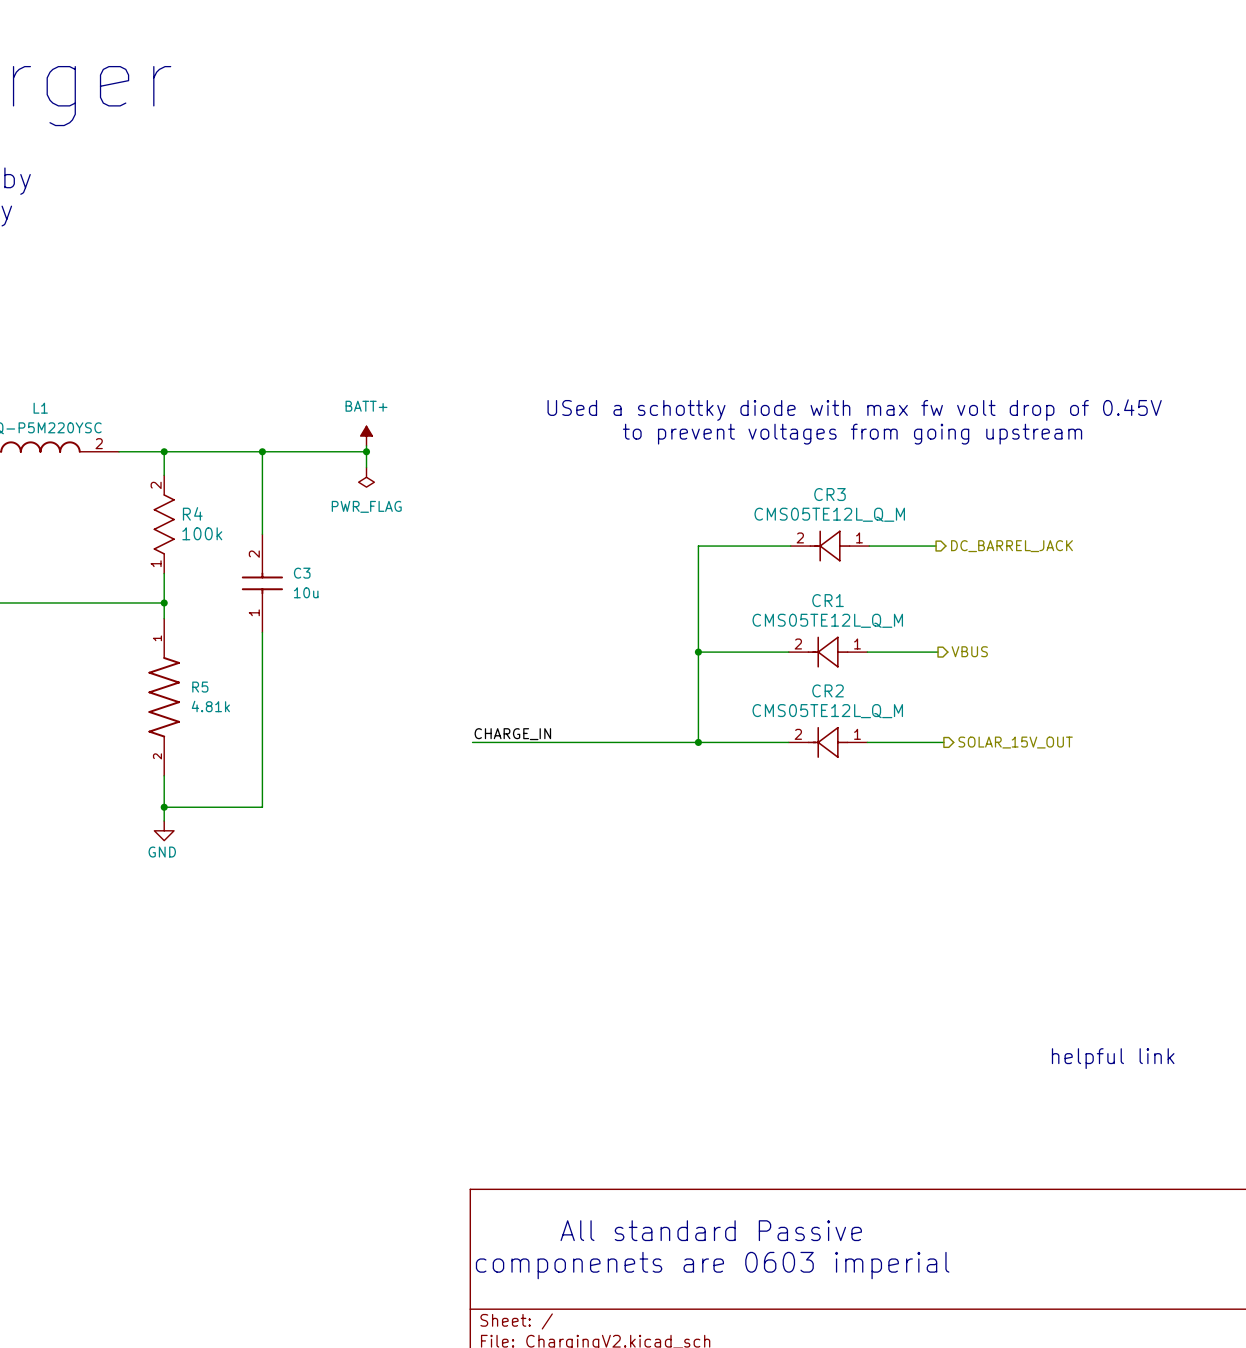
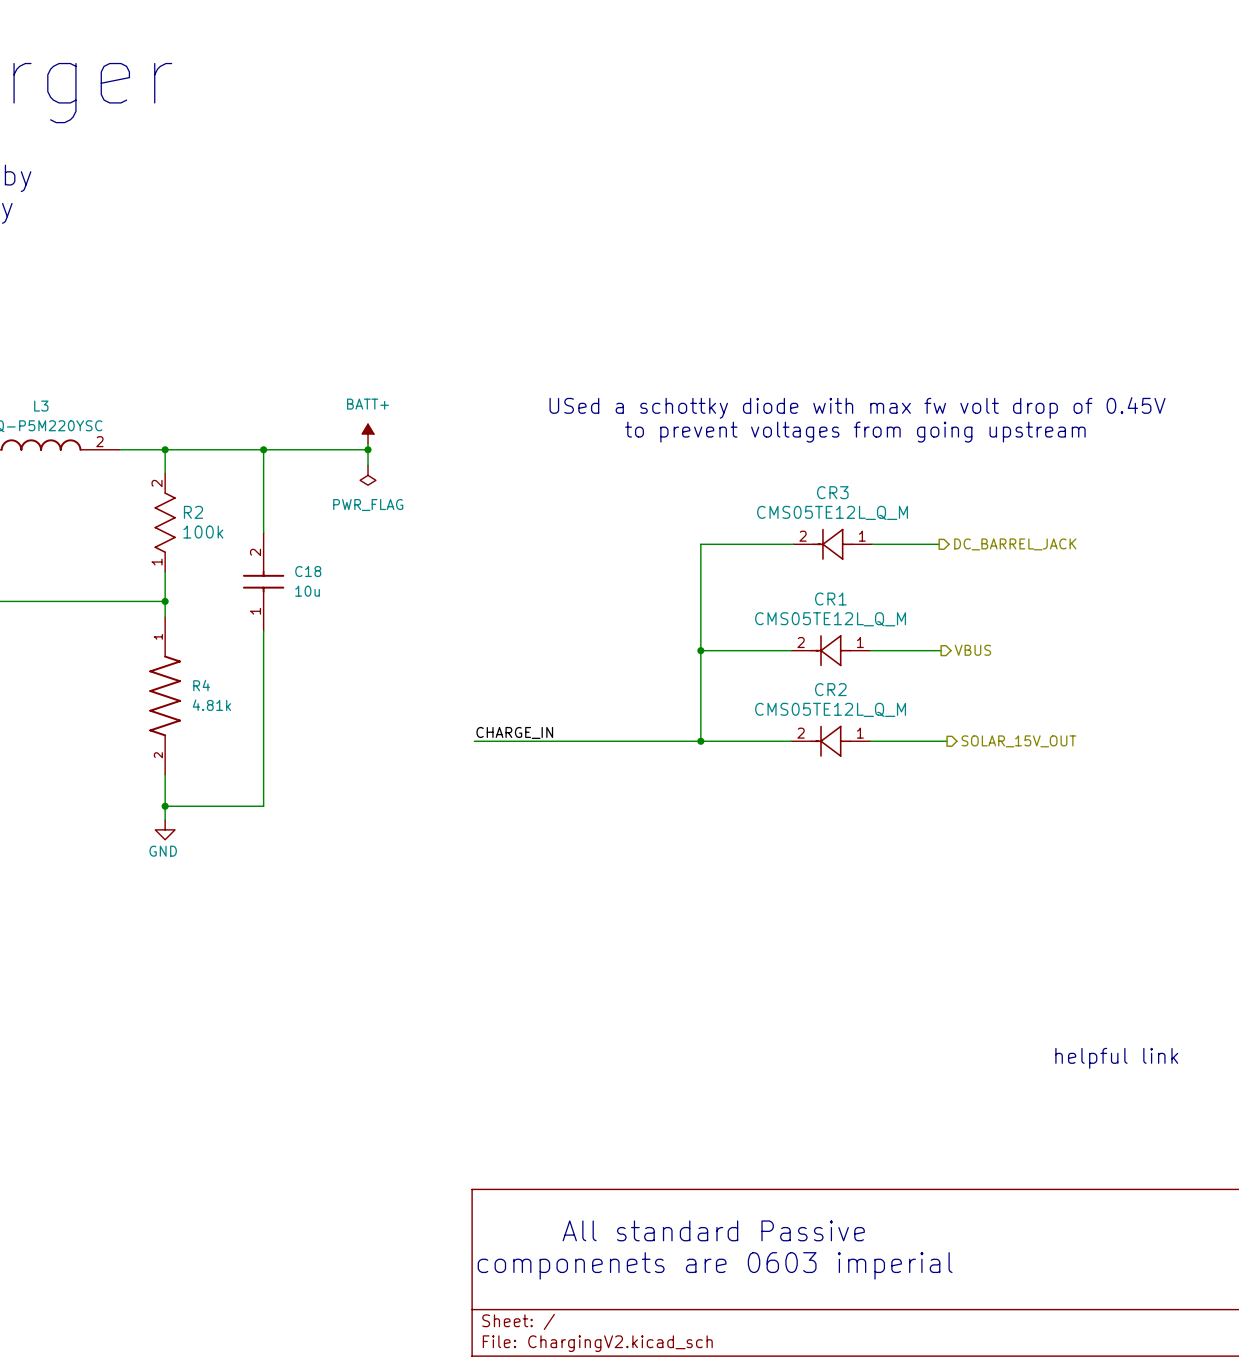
L1 name: L1 (40, 408) -> L3 (41, 406)
R4 name: R4 (192, 513) -> R2 (193, 512)
C3 name: C3 (302, 573) -> C18 (308, 571)
R5 name: R5 (200, 687) -> R4 (201, 685)

